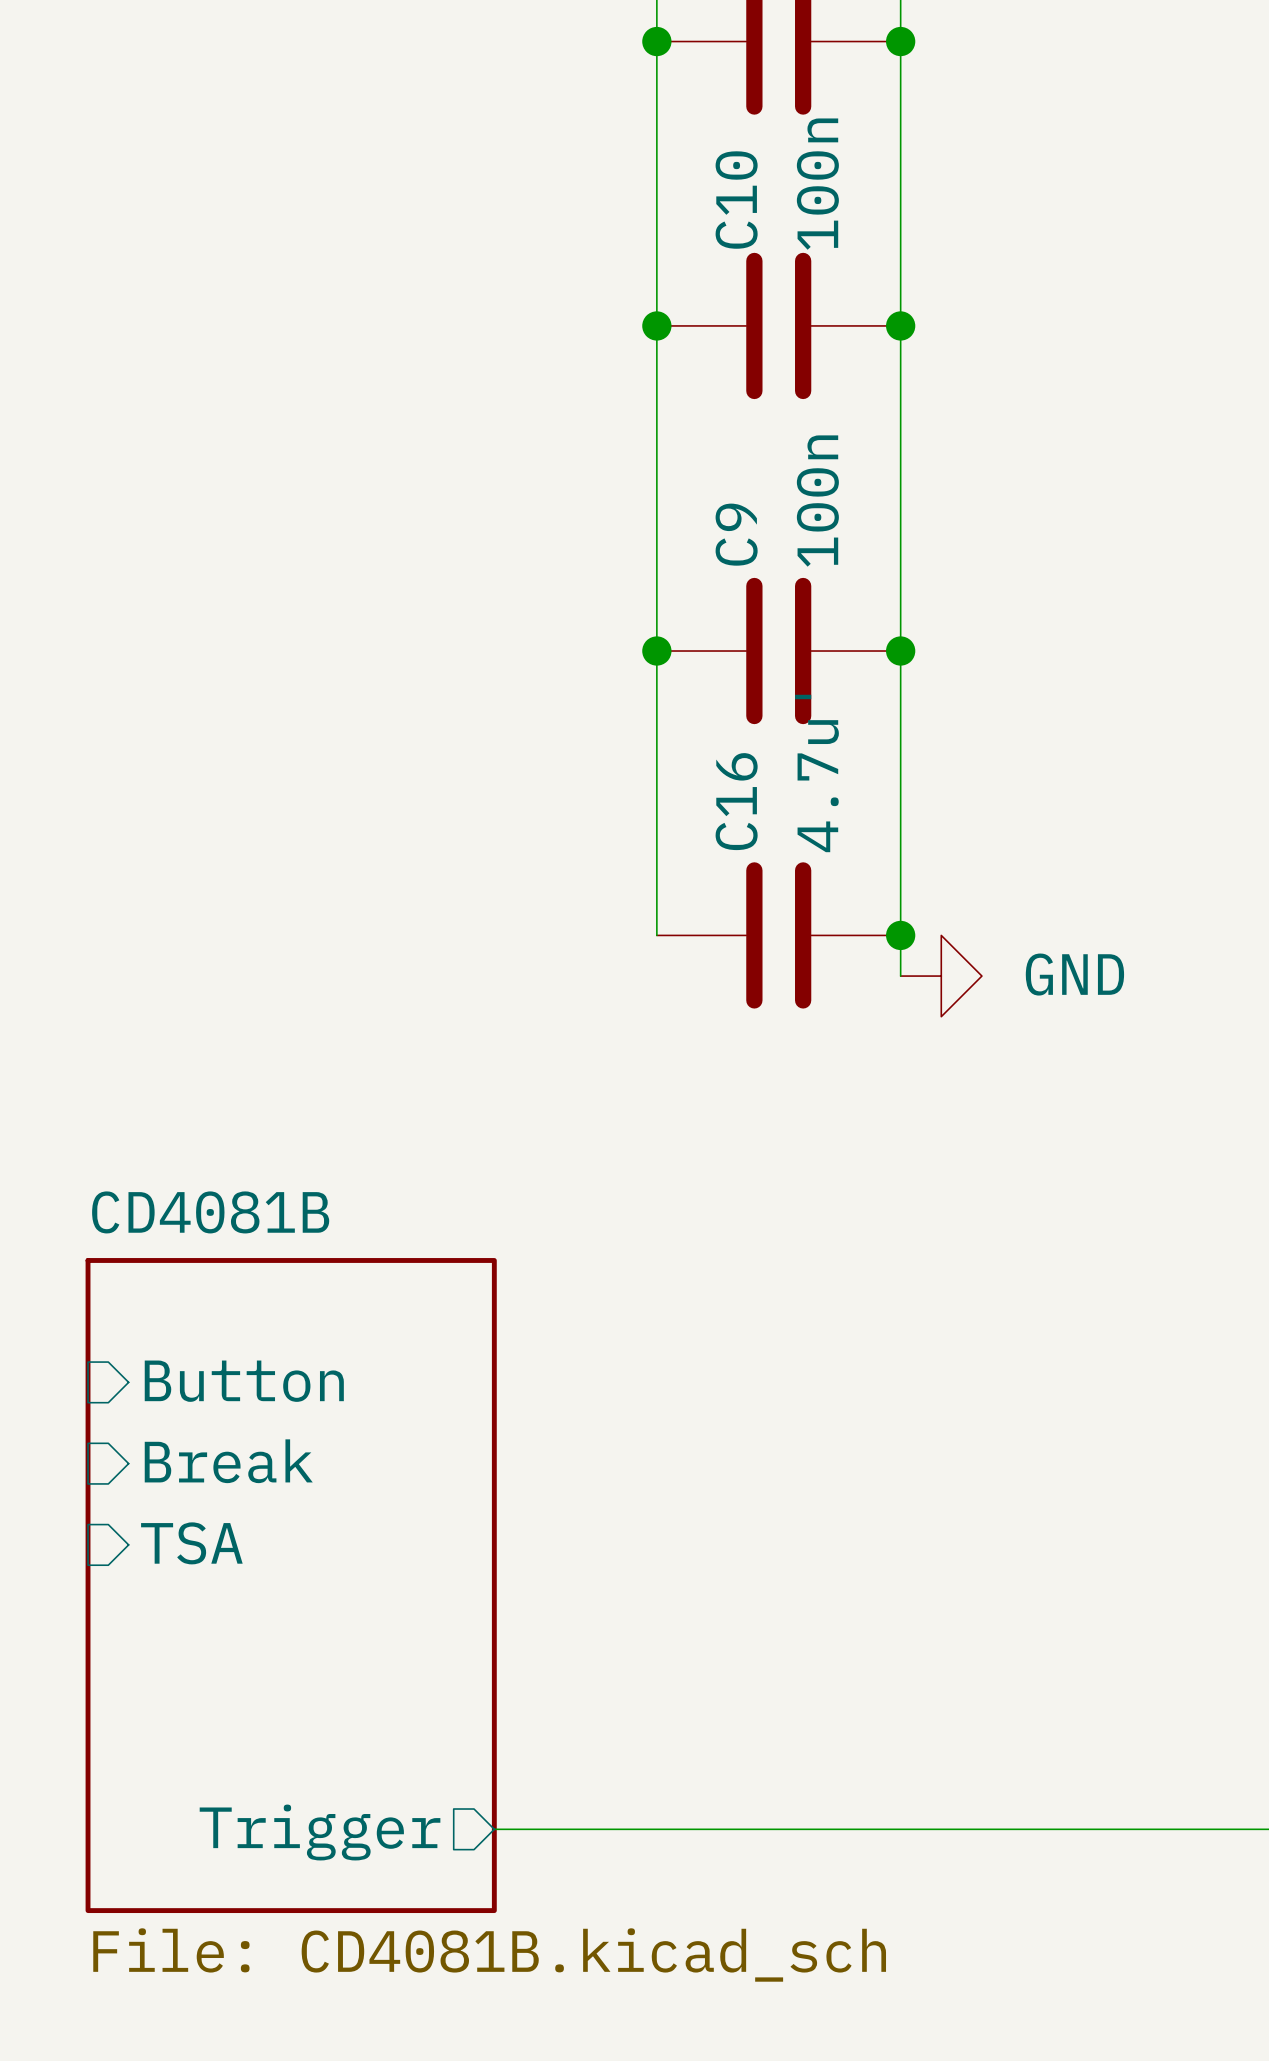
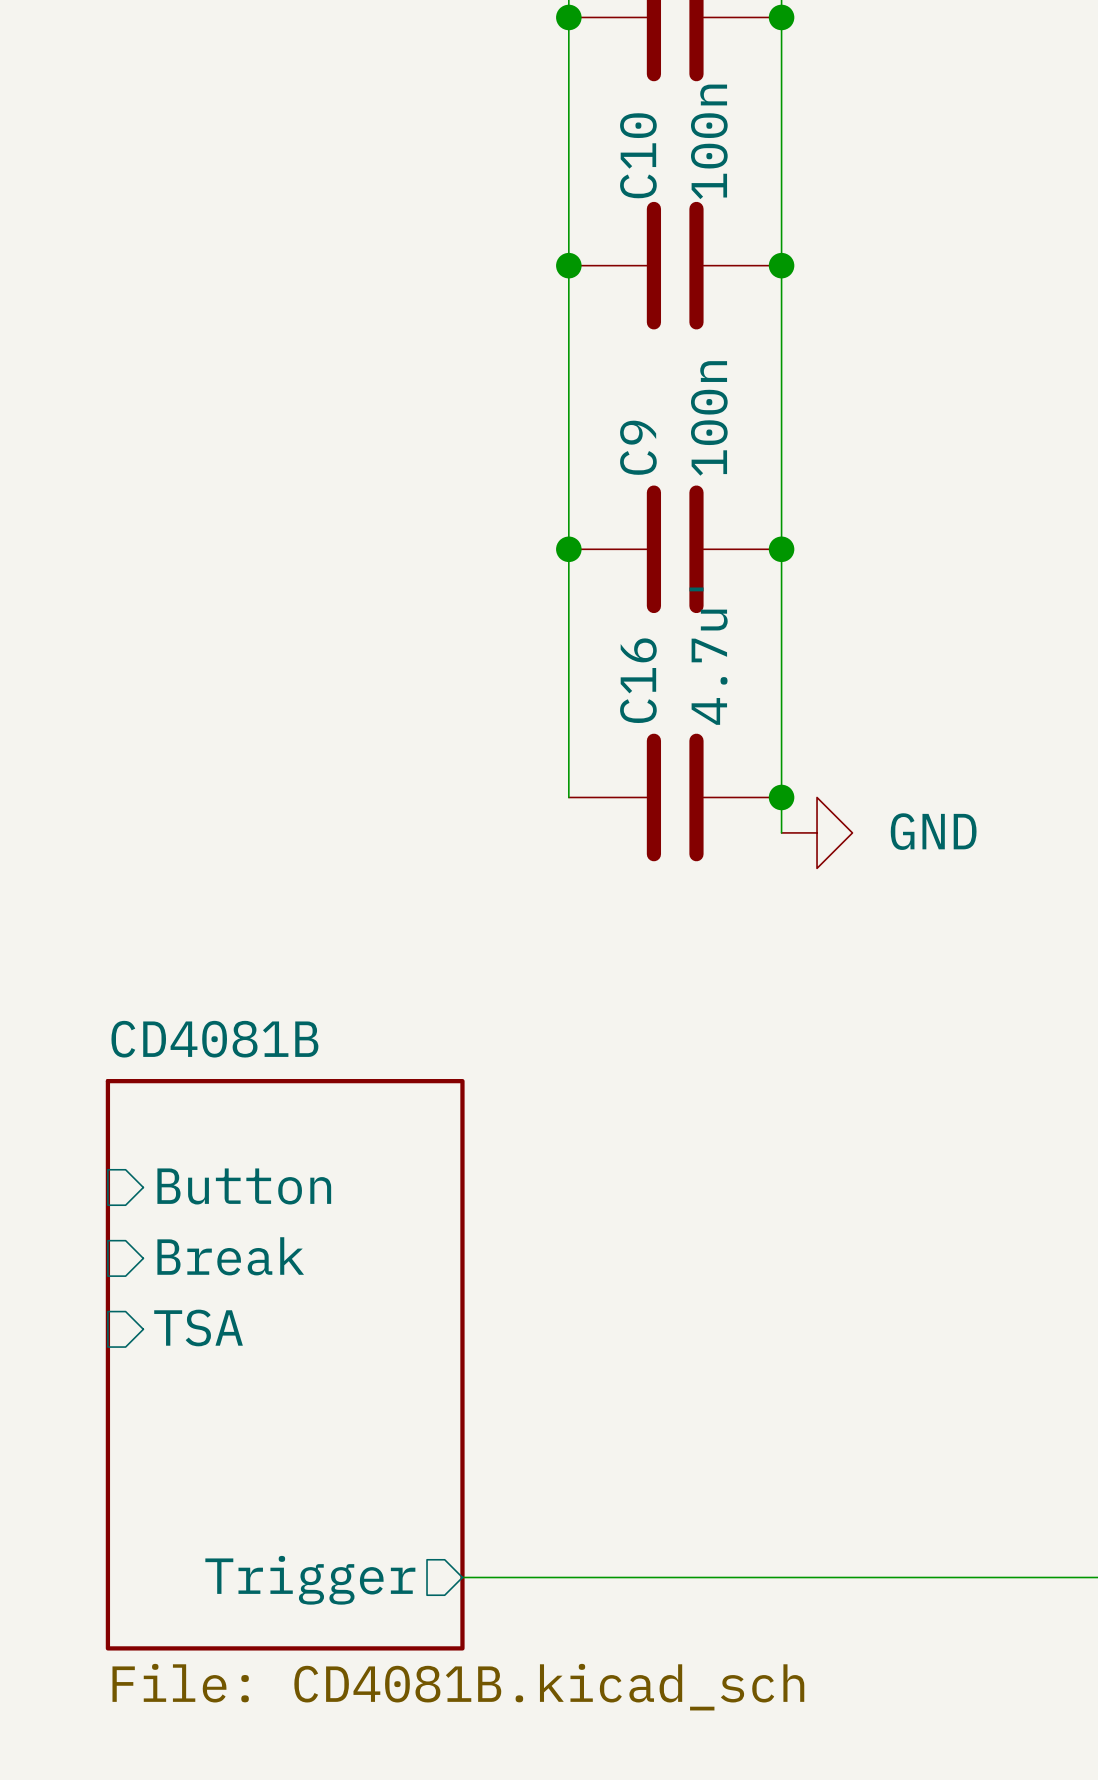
sheet pin position: Button (244, 1381) -> Button (244, 1186)
sheet pin position: Break (228, 1461) -> Break (230, 1256)
sheet pin position: TSA (191, 1543) -> TSA (198, 1327)
sheet CD4081B position: (291, 1585) -> (285, 1364)
wire: (494, 1829) (534, 1829) -> none
sheet pin position: Trigger (320, 1832) -> Trigger (310, 1580)

